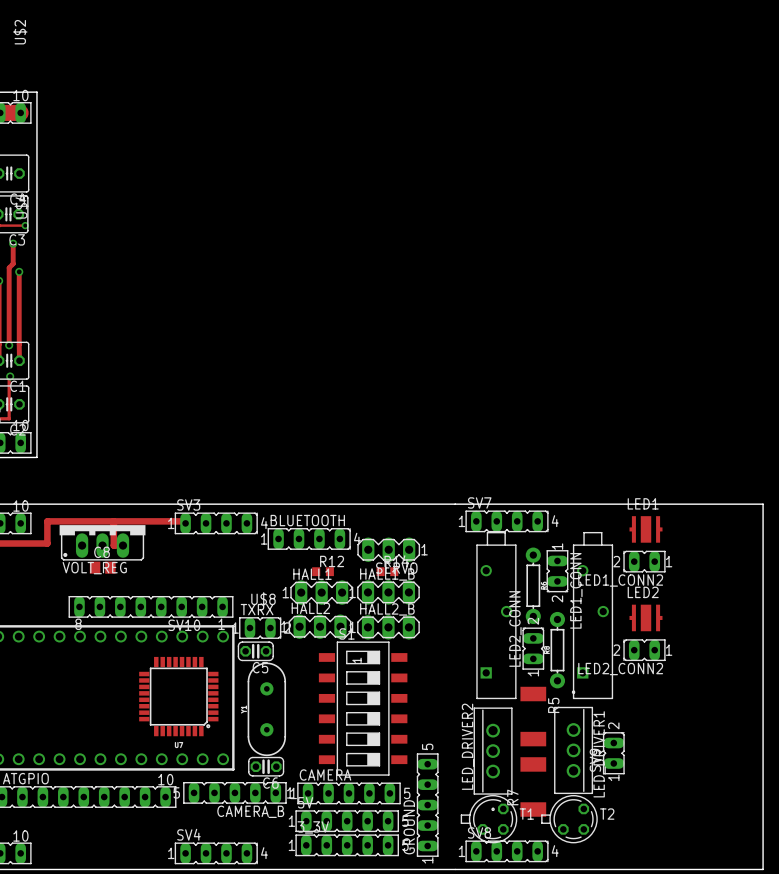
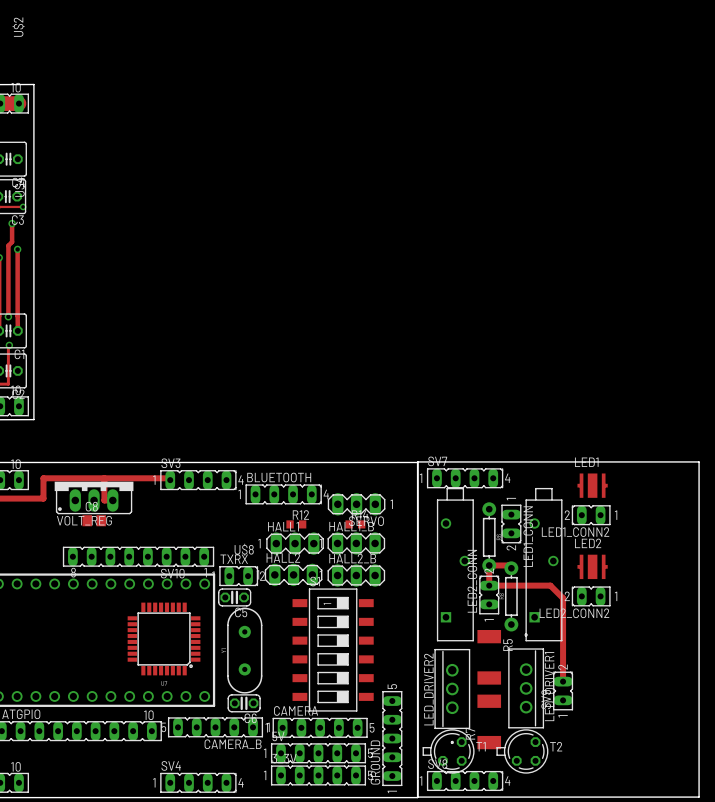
board edge: none -> (417, 461) (699, 461) (699, 797) (417, 797) (417, 461)
board edge: (455, 504) (763, 504) (763, 869) (455, 869) -> (417, 462) (417, 797)
track: none -> (511, 568) (508, 565) (489, 565) (489, 585) (550, 585) (563, 598) (563, 681)

